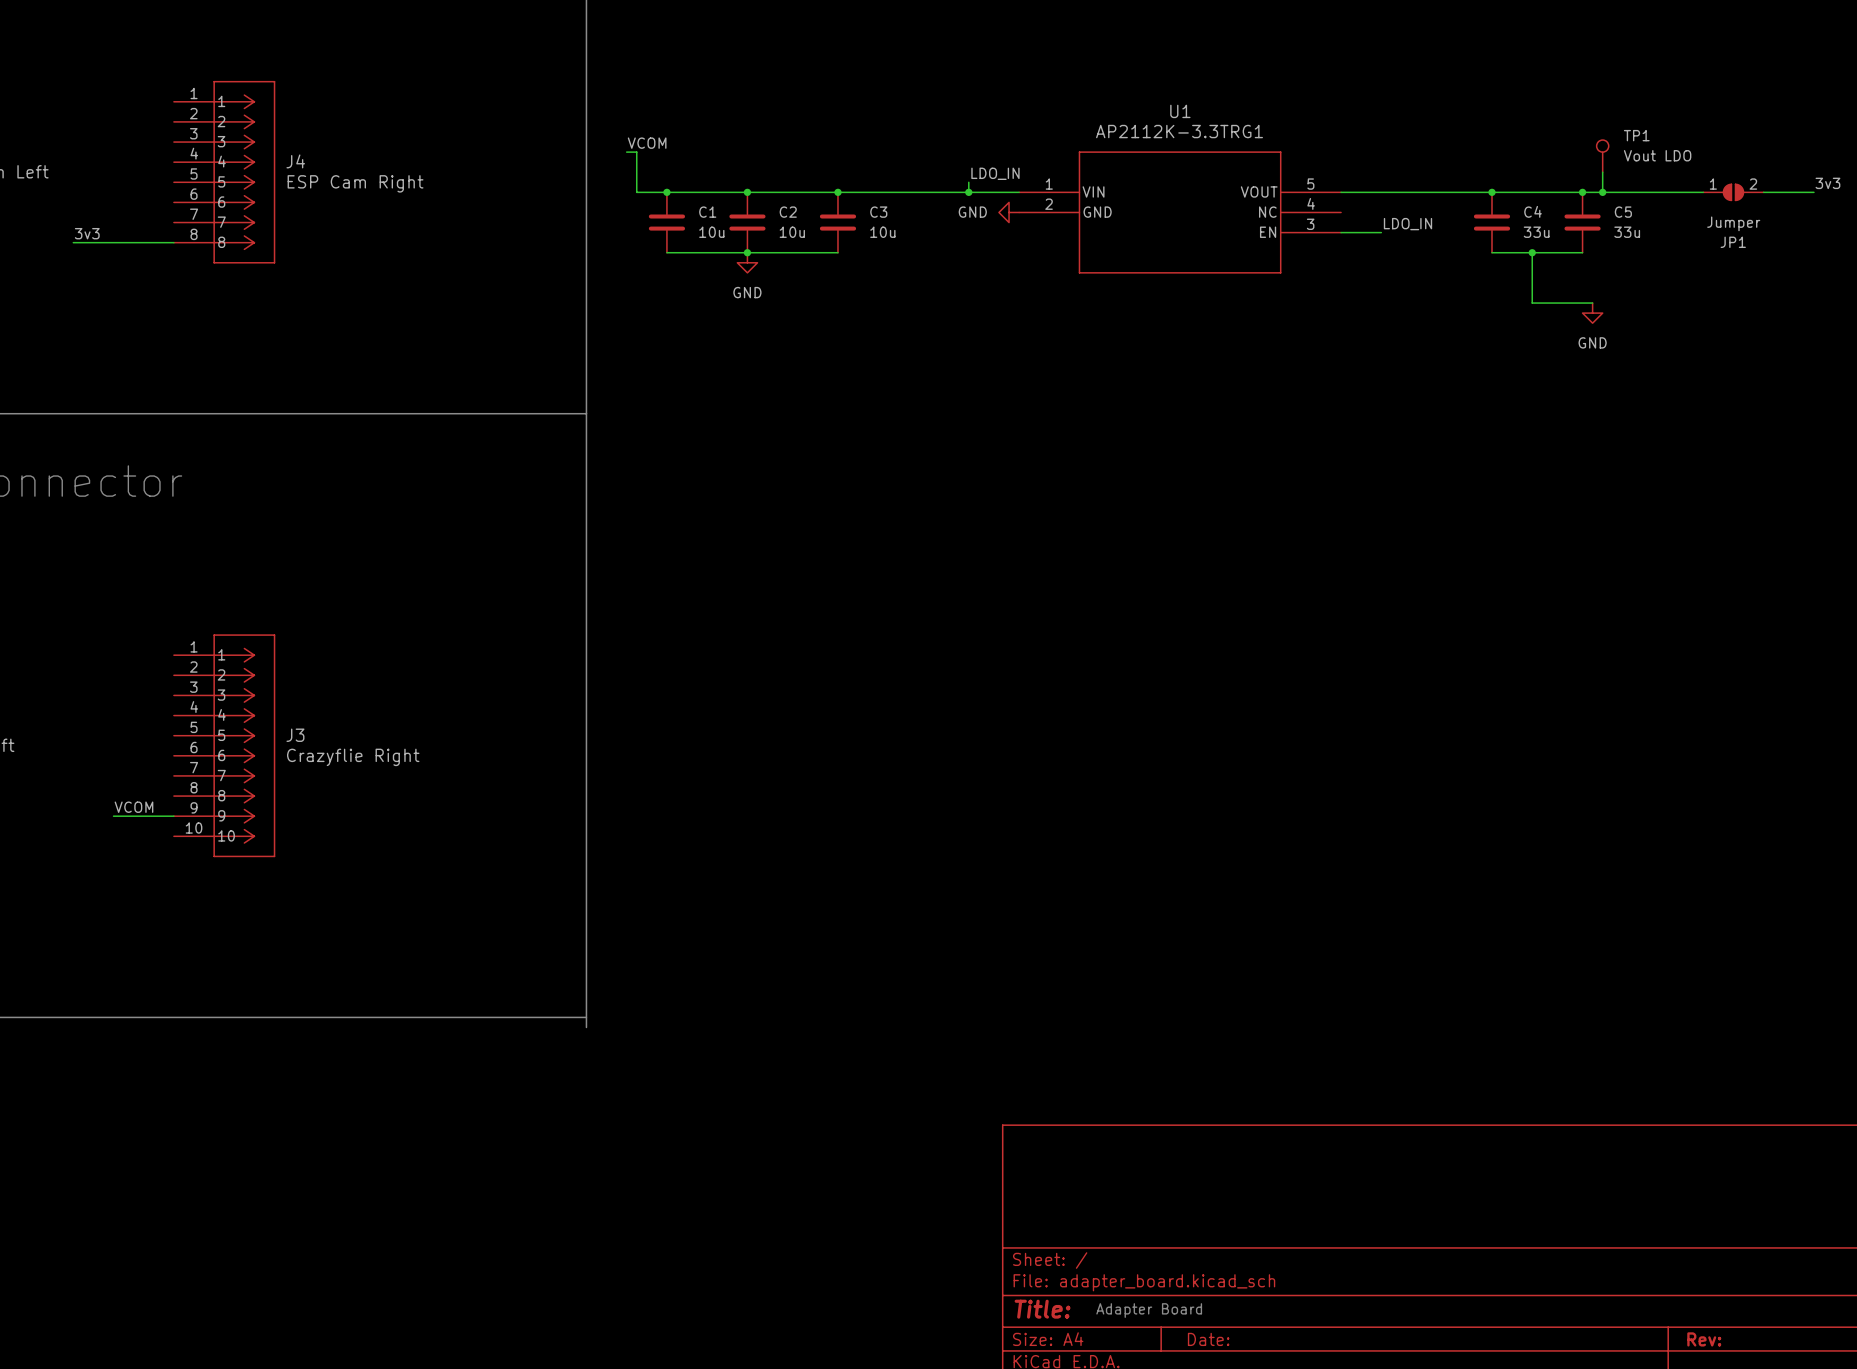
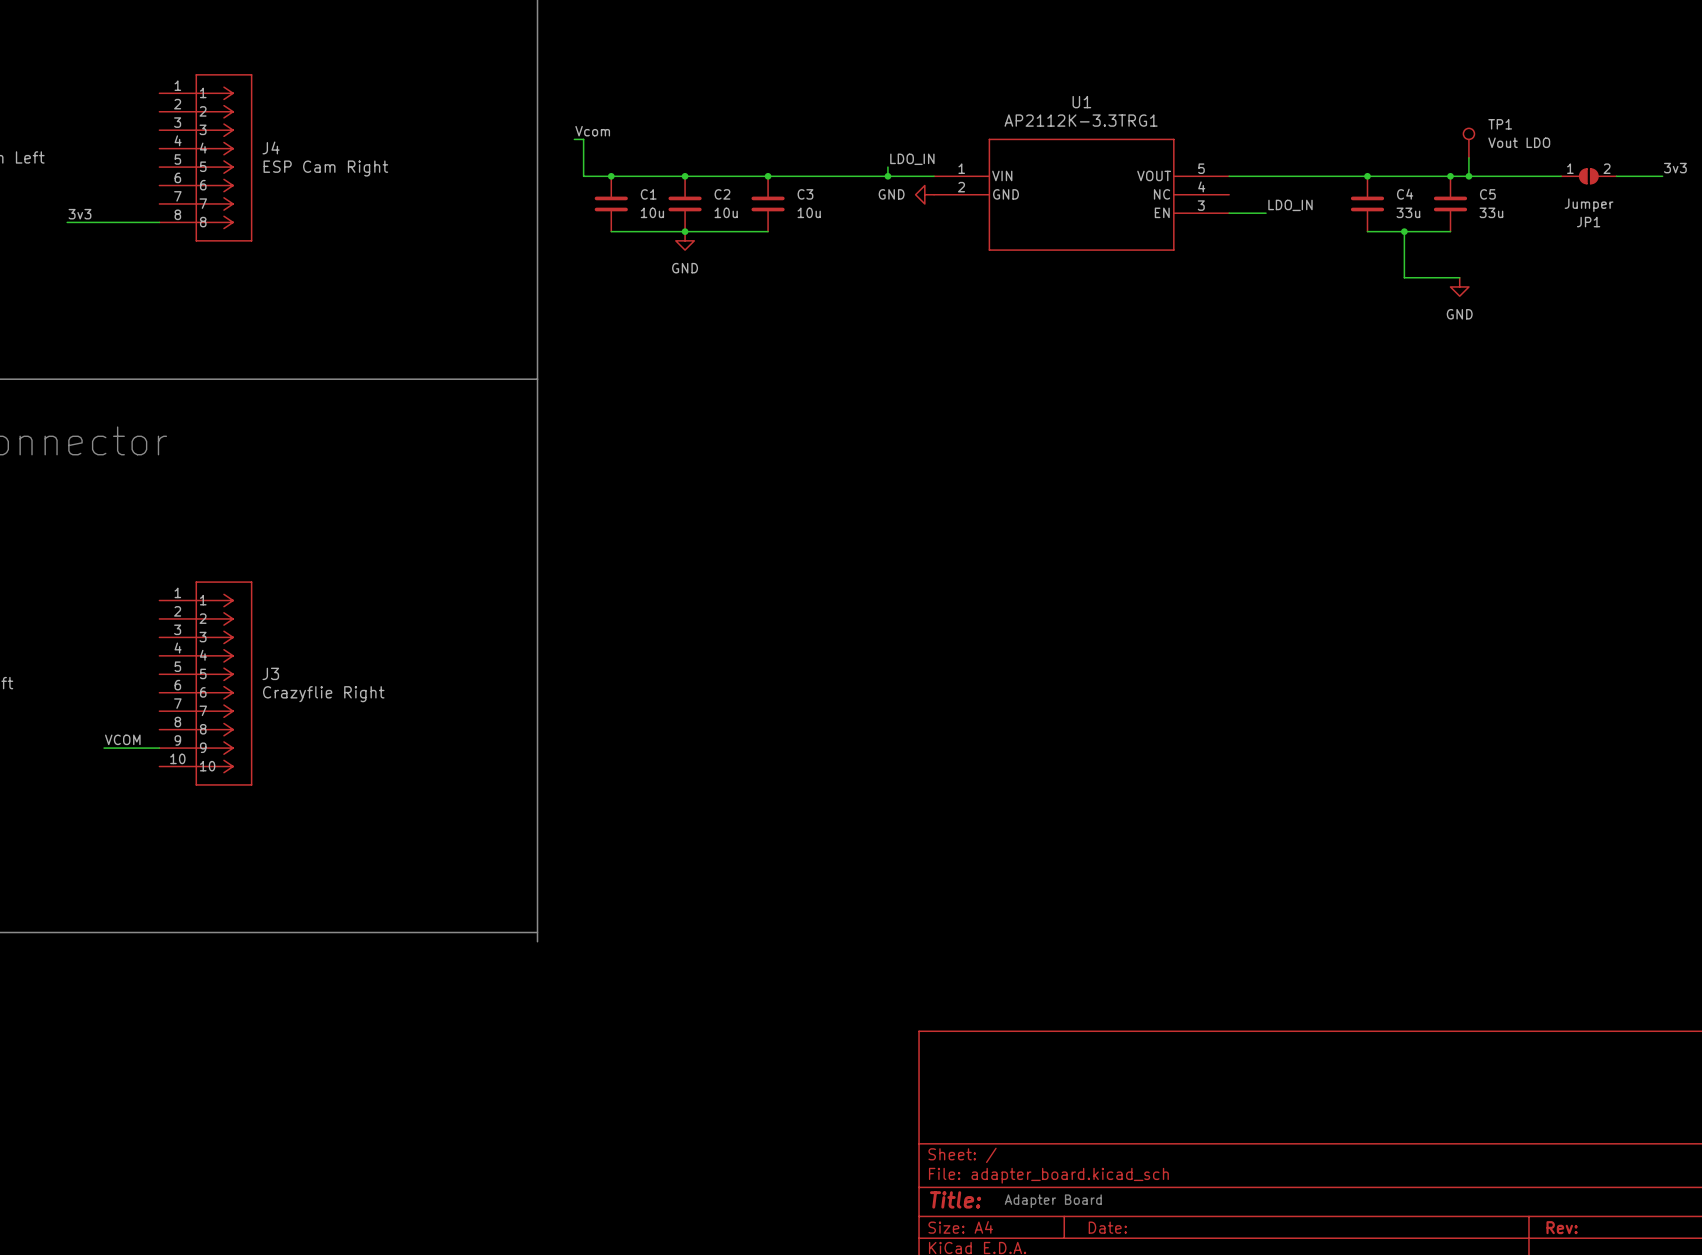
label: VCOM (647, 143) -> Vcom (592, 131)

